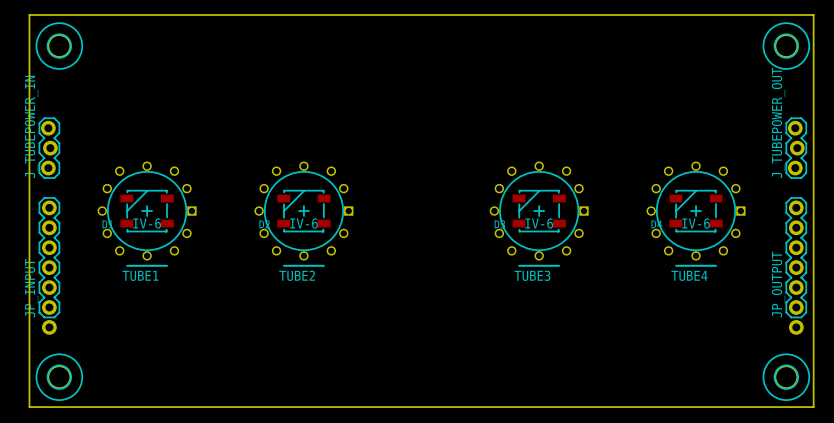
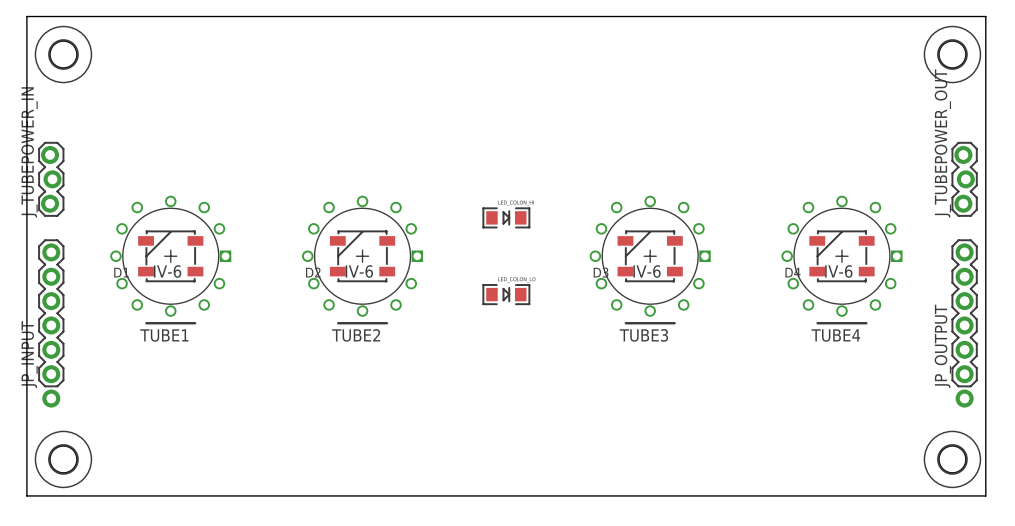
part: none -> (506, 217)
part: none -> (506, 294)

